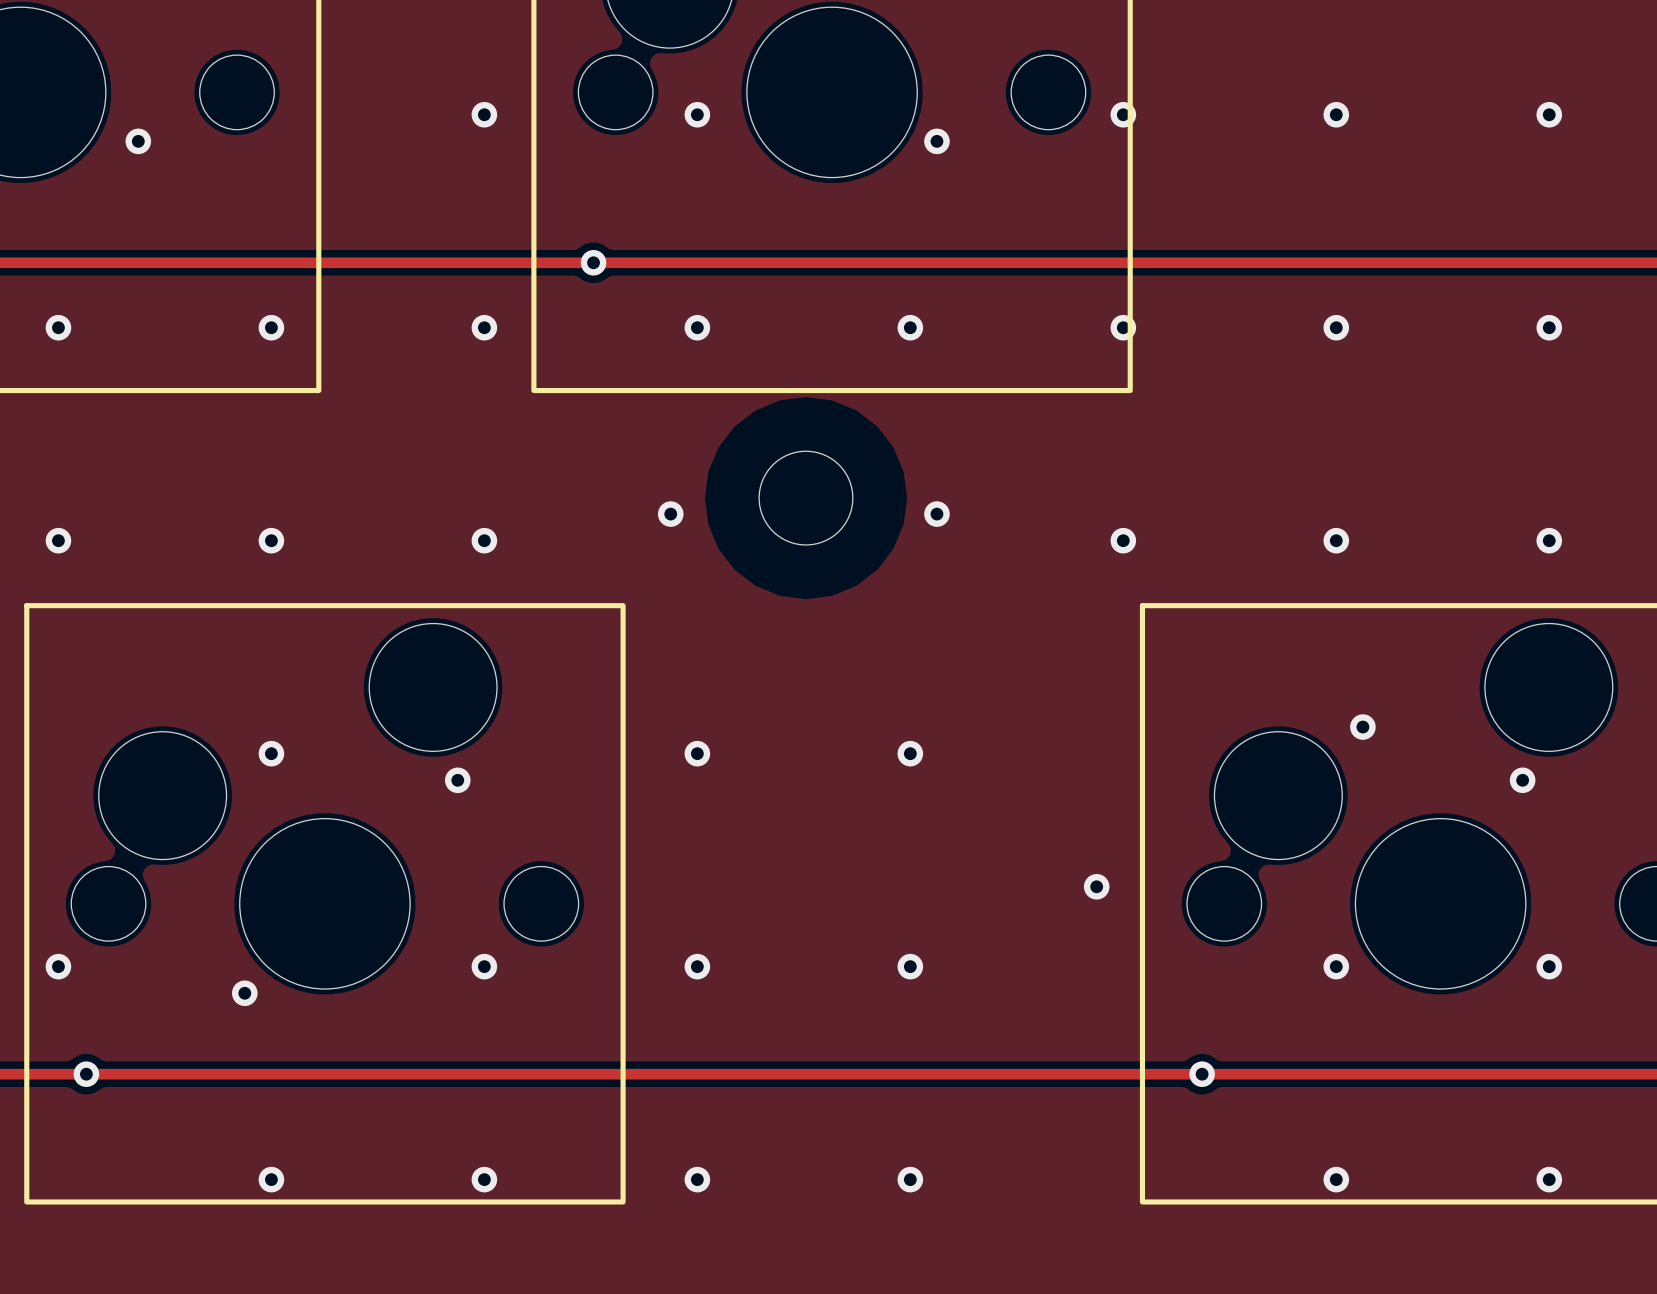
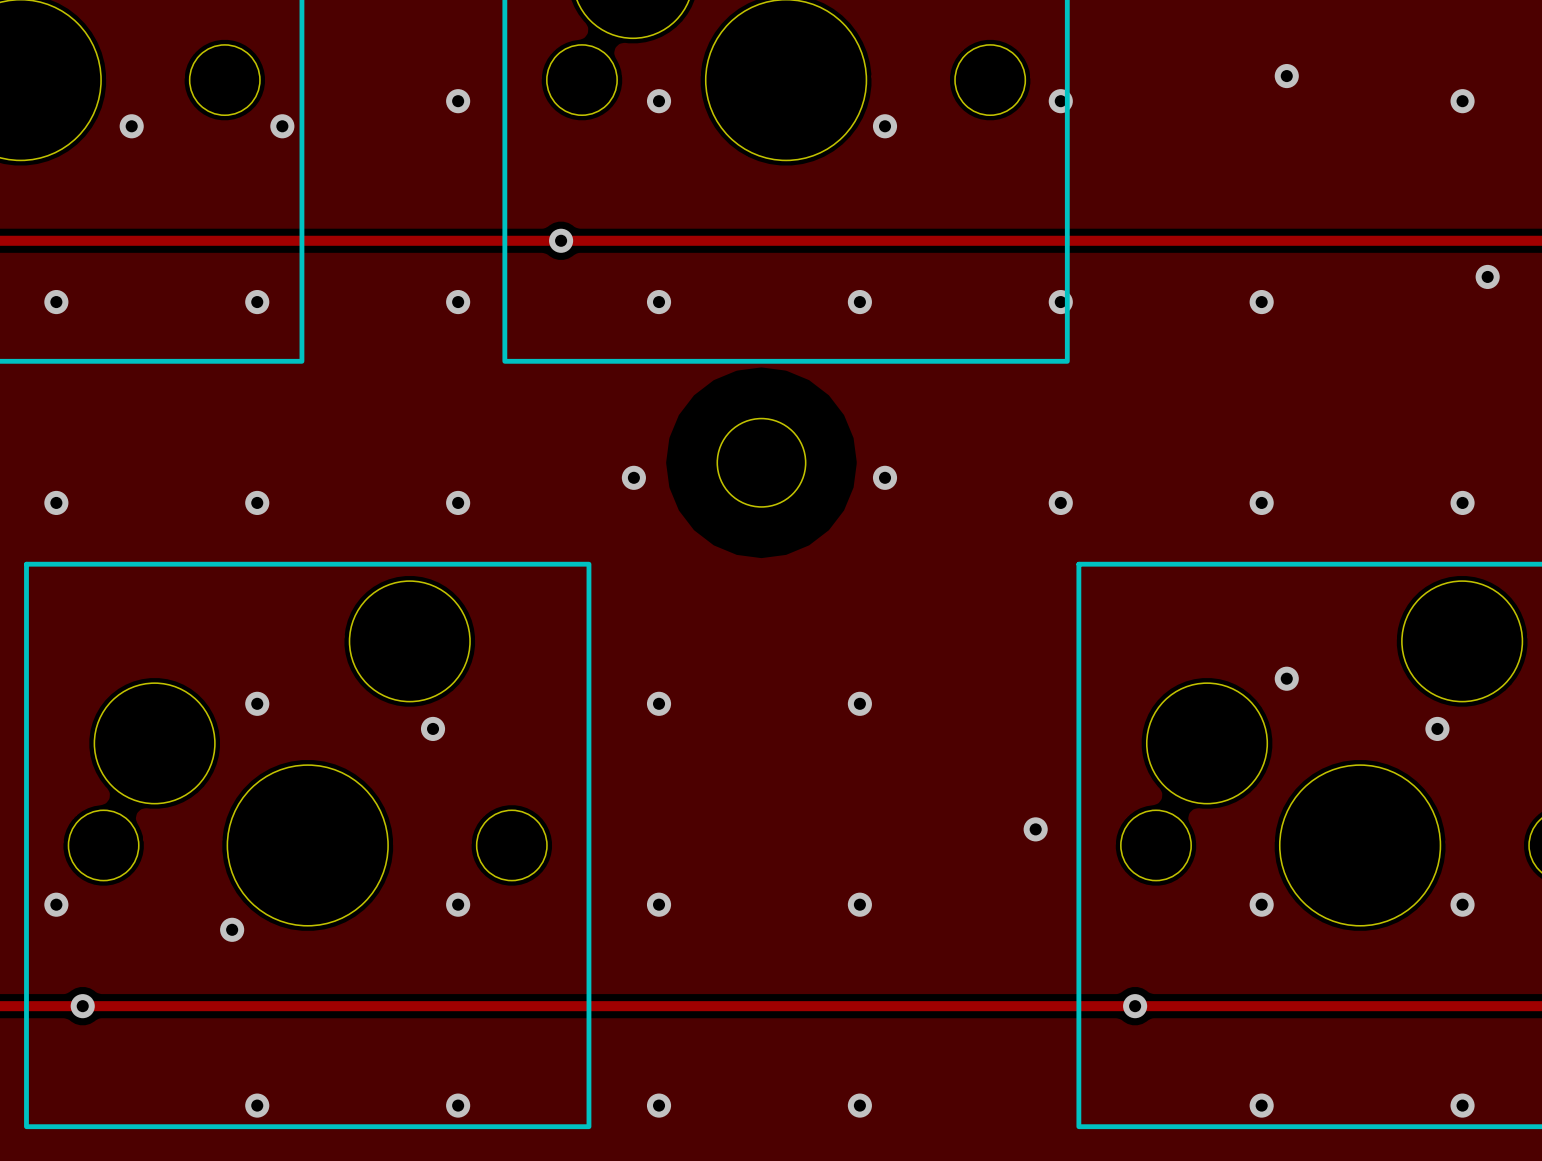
via position: (1336, 114) -> (1286, 76)
via: none -> (282, 126)
via position: (1549, 327) -> (1487, 276)

